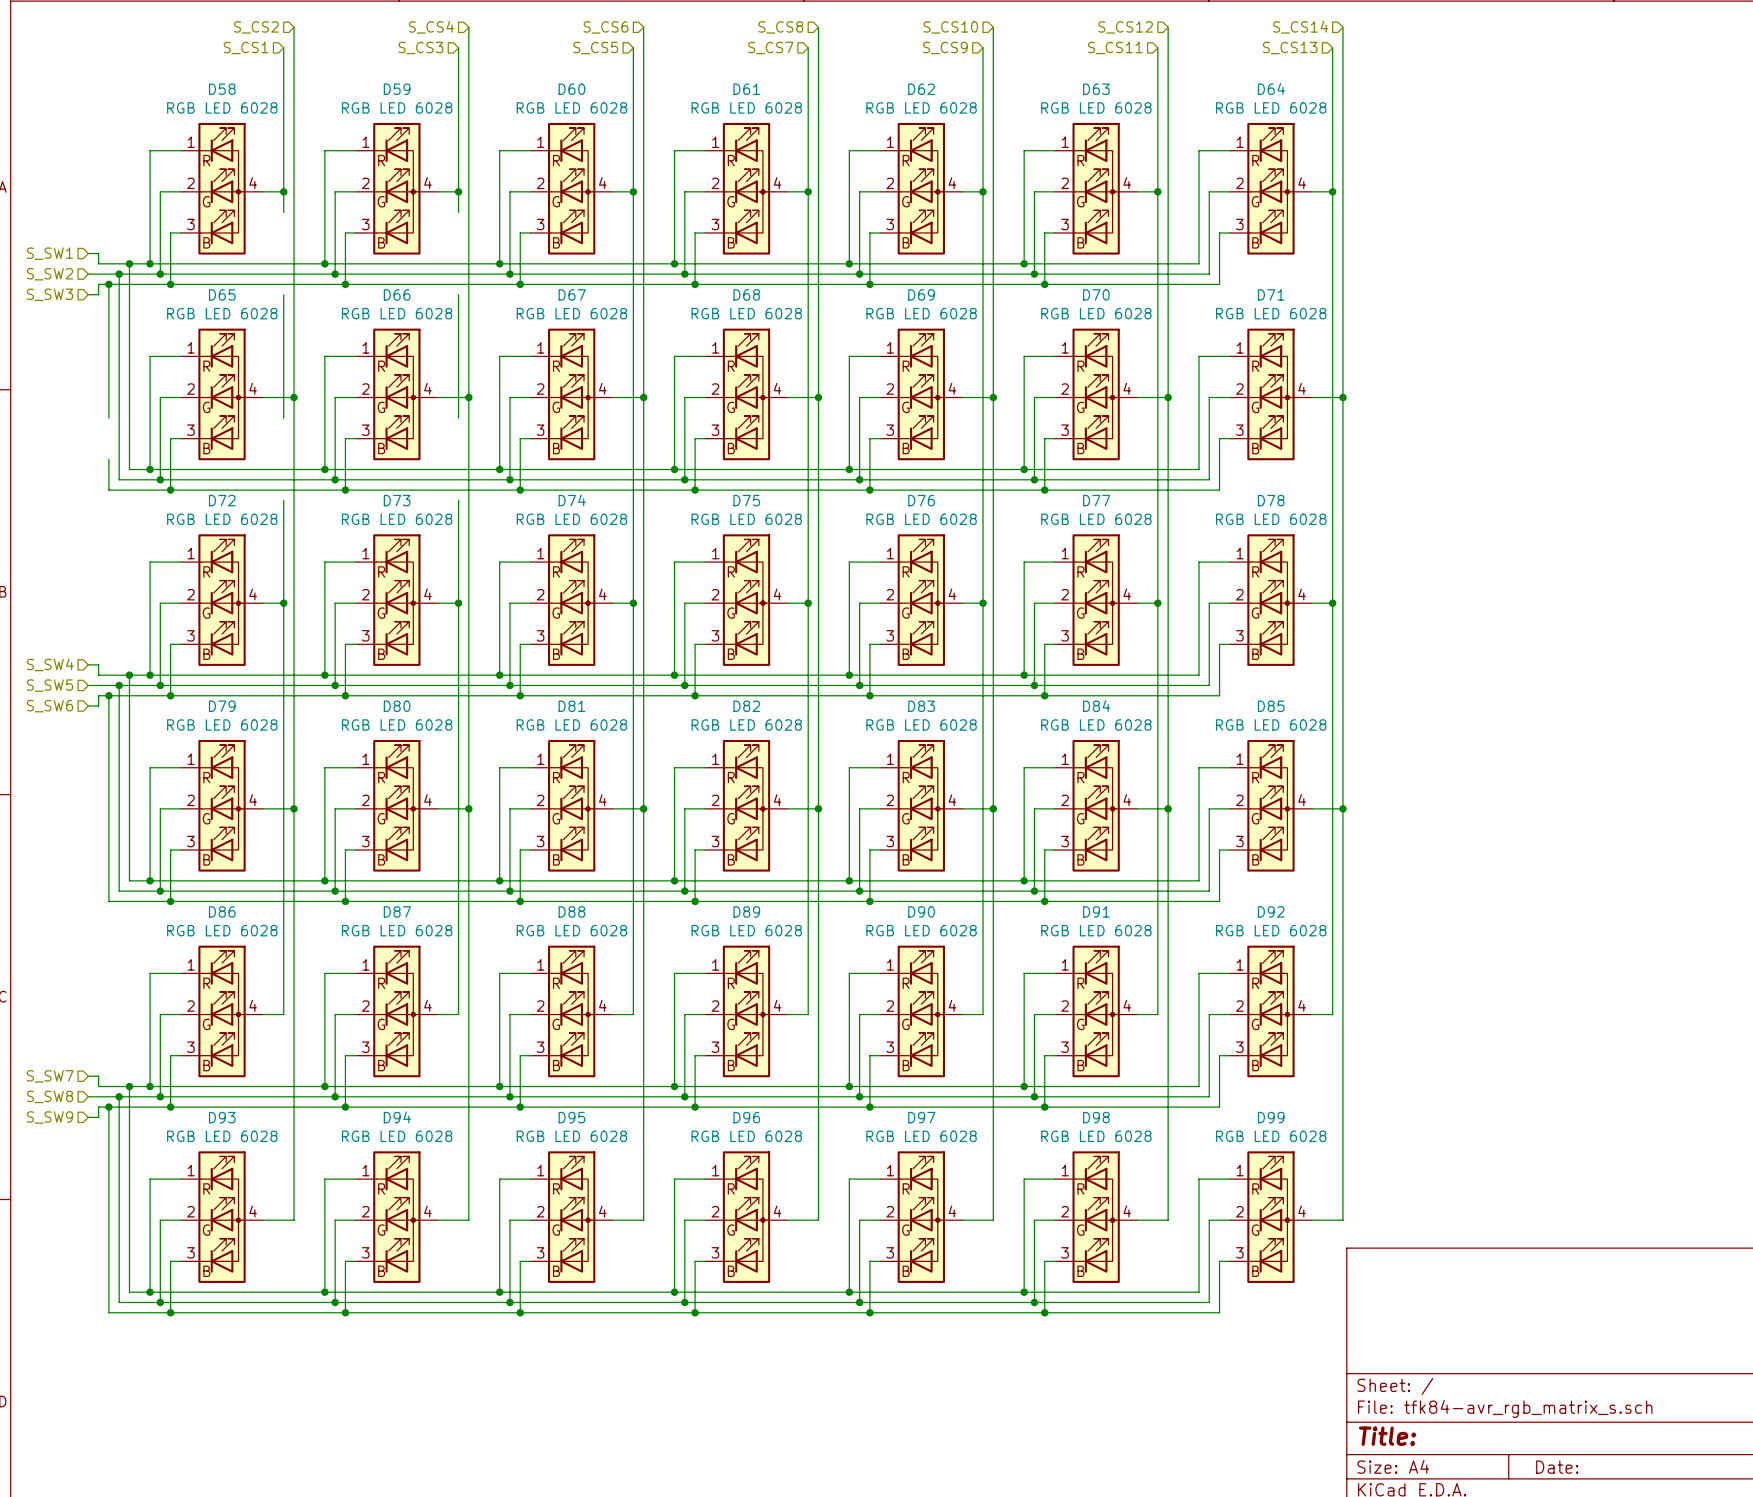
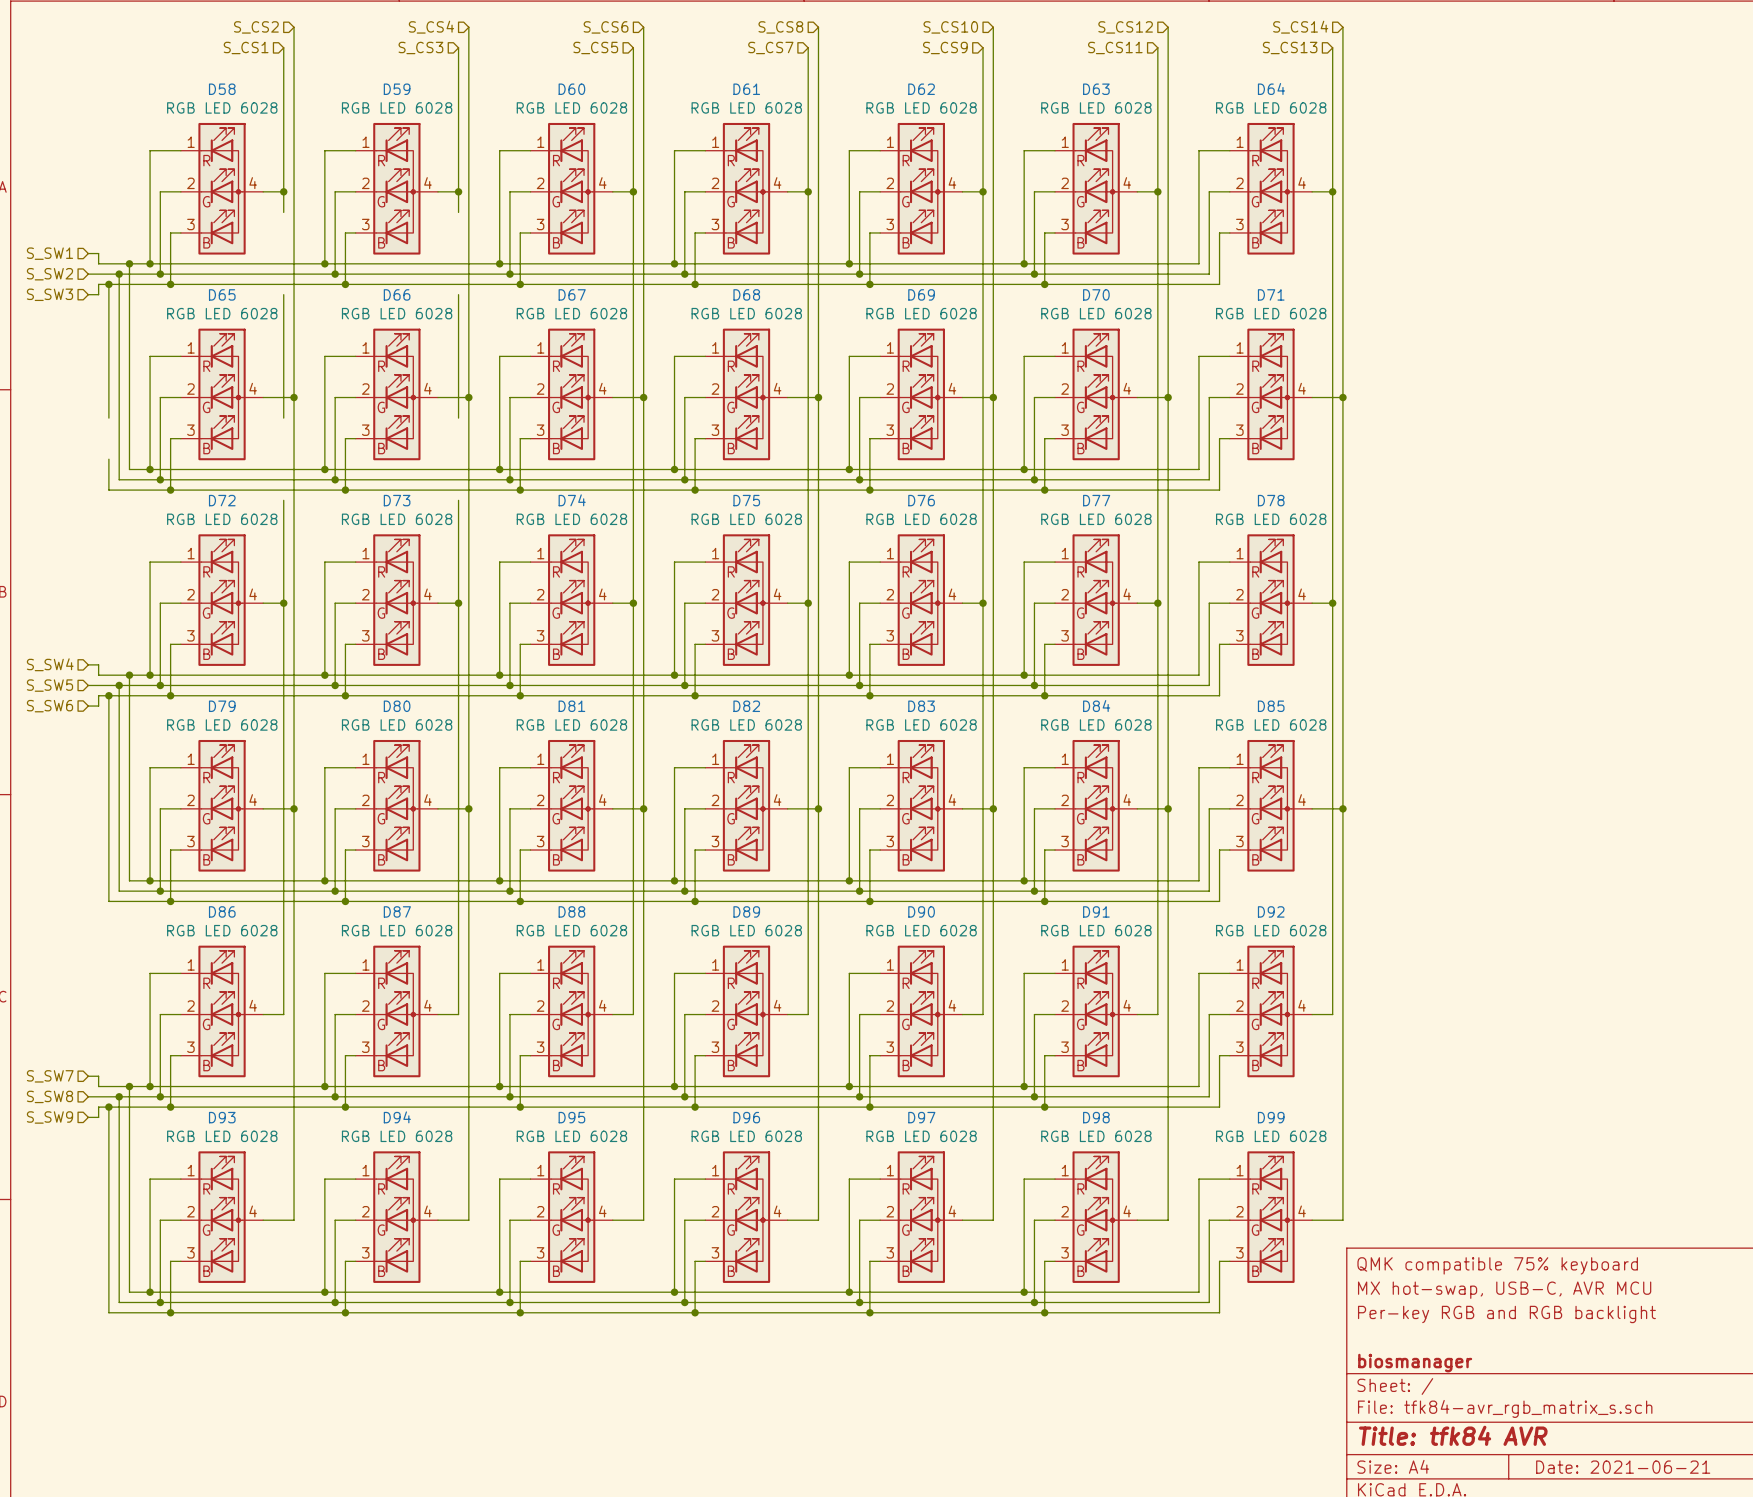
title block: none -> QMK compatible 75% keyboard (1497, 1265)
title block: none -> MX hot-swap, USB-C, AVR MCU (1504, 1290)
title block: none -> Per-key RGB and RGB backlight (1506, 1314)
title block: none -> biosmanager (1415, 1363)
title block: Title: (1387, 1436) -> Title: tfk84 AVR (1453, 1435)
title block: Date: (1557, 1467) -> Date: 2021-06-21 (1623, 1467)

